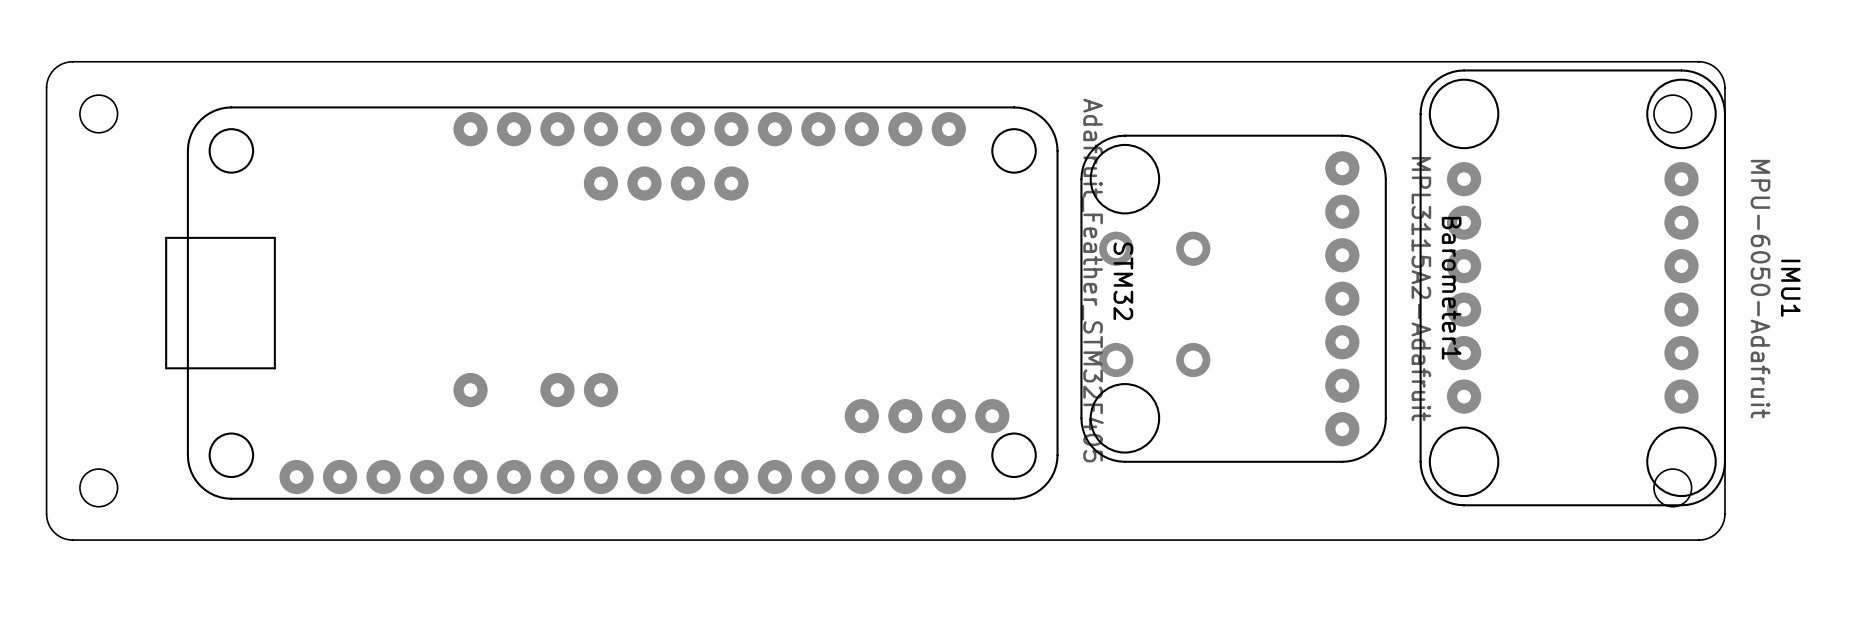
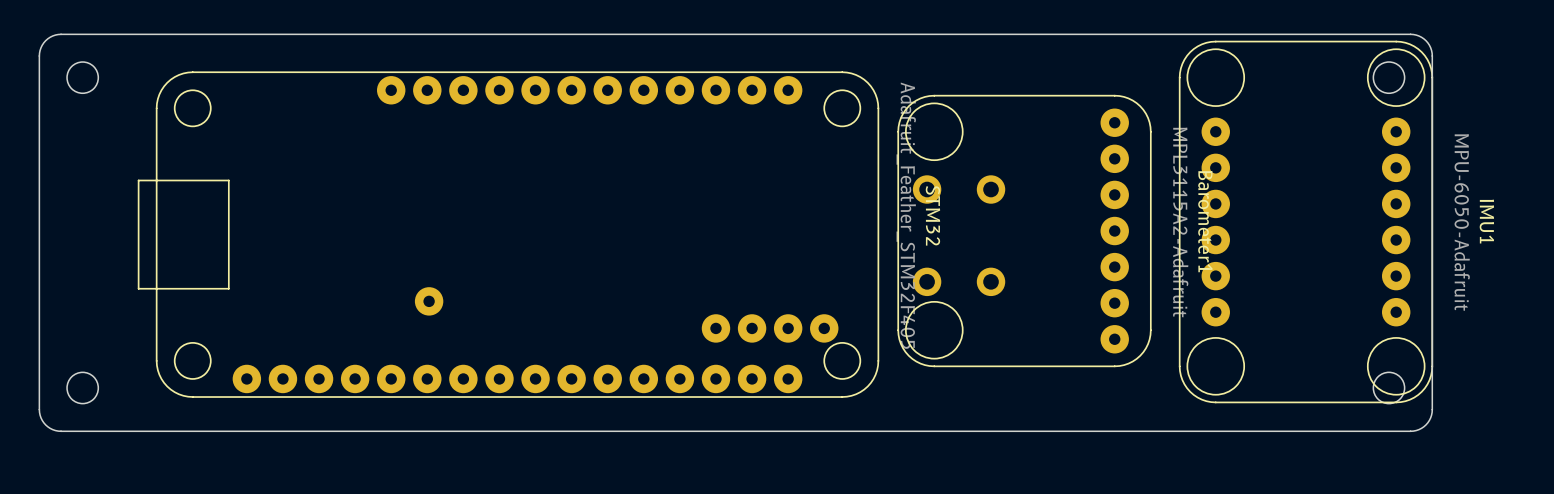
part: (600, 183) -> none
part: (644, 183) -> none
part: (687, 183) -> none
part: (731, 183) -> none
part: none -> (429, 301)
part: (470, 390) -> none
part: (557, 390) -> none
part: (600, 390) -> none

